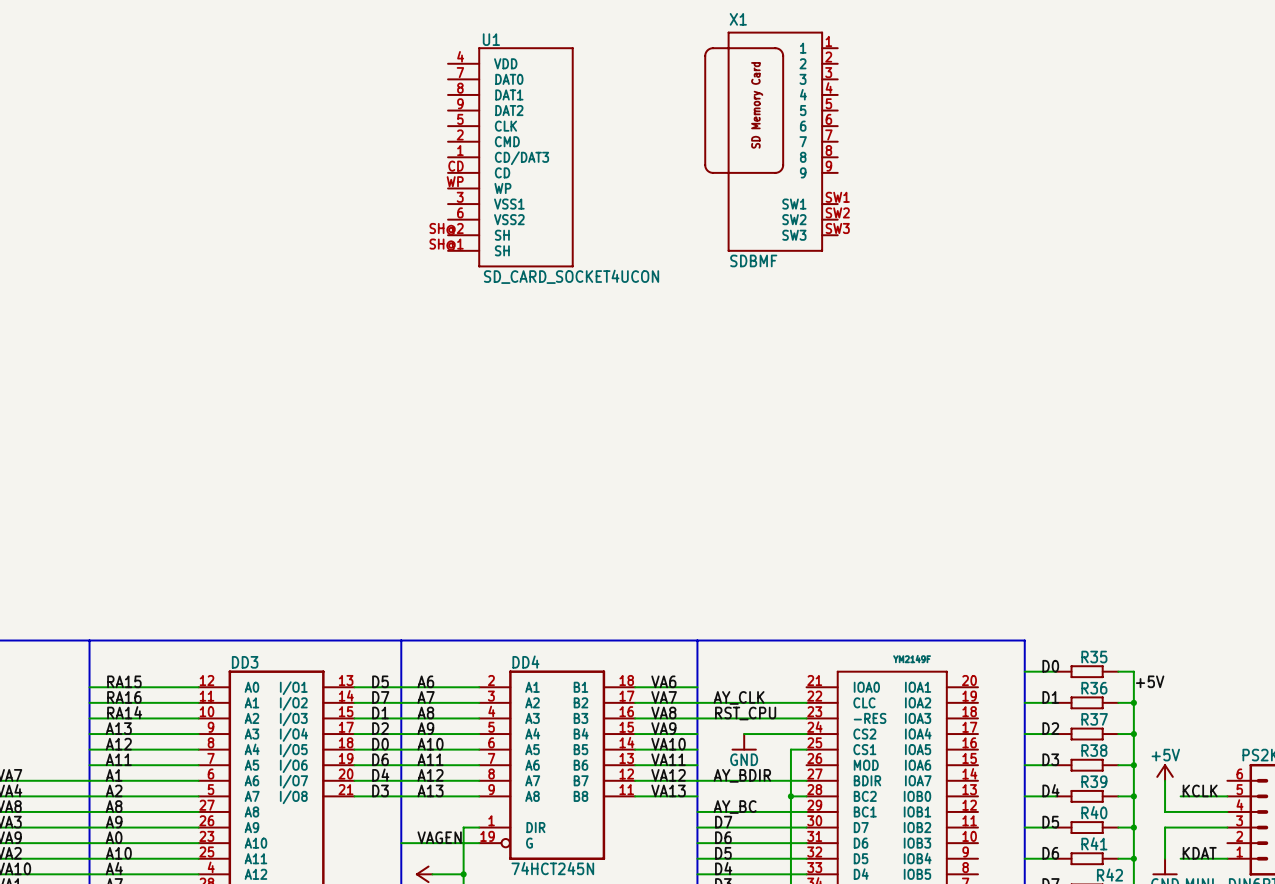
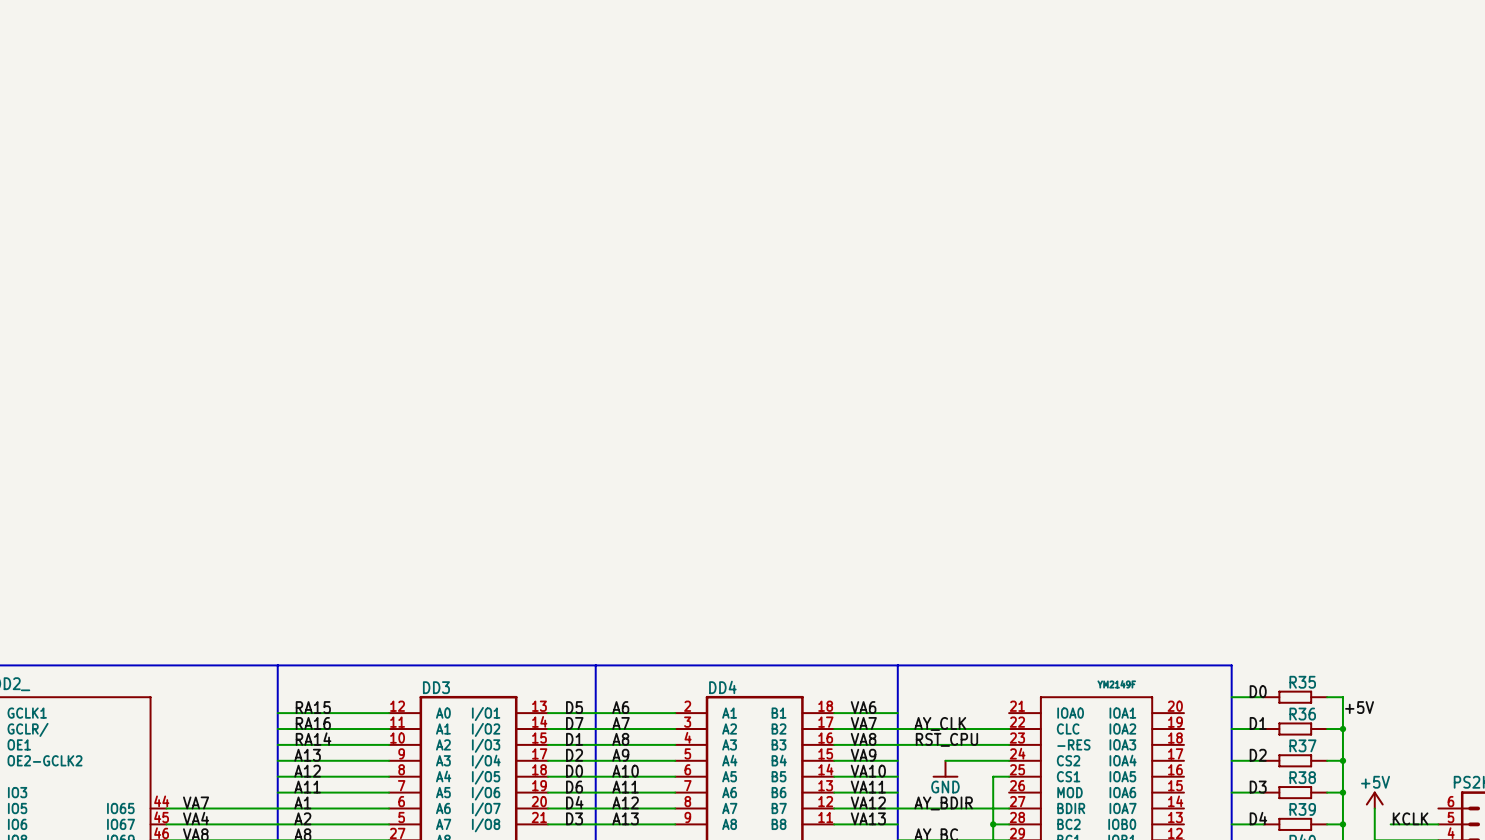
X1: SDBMF (771, 141) -> none
U1: SD_CARD_SOCKET4UCON (510, 157) -> none

